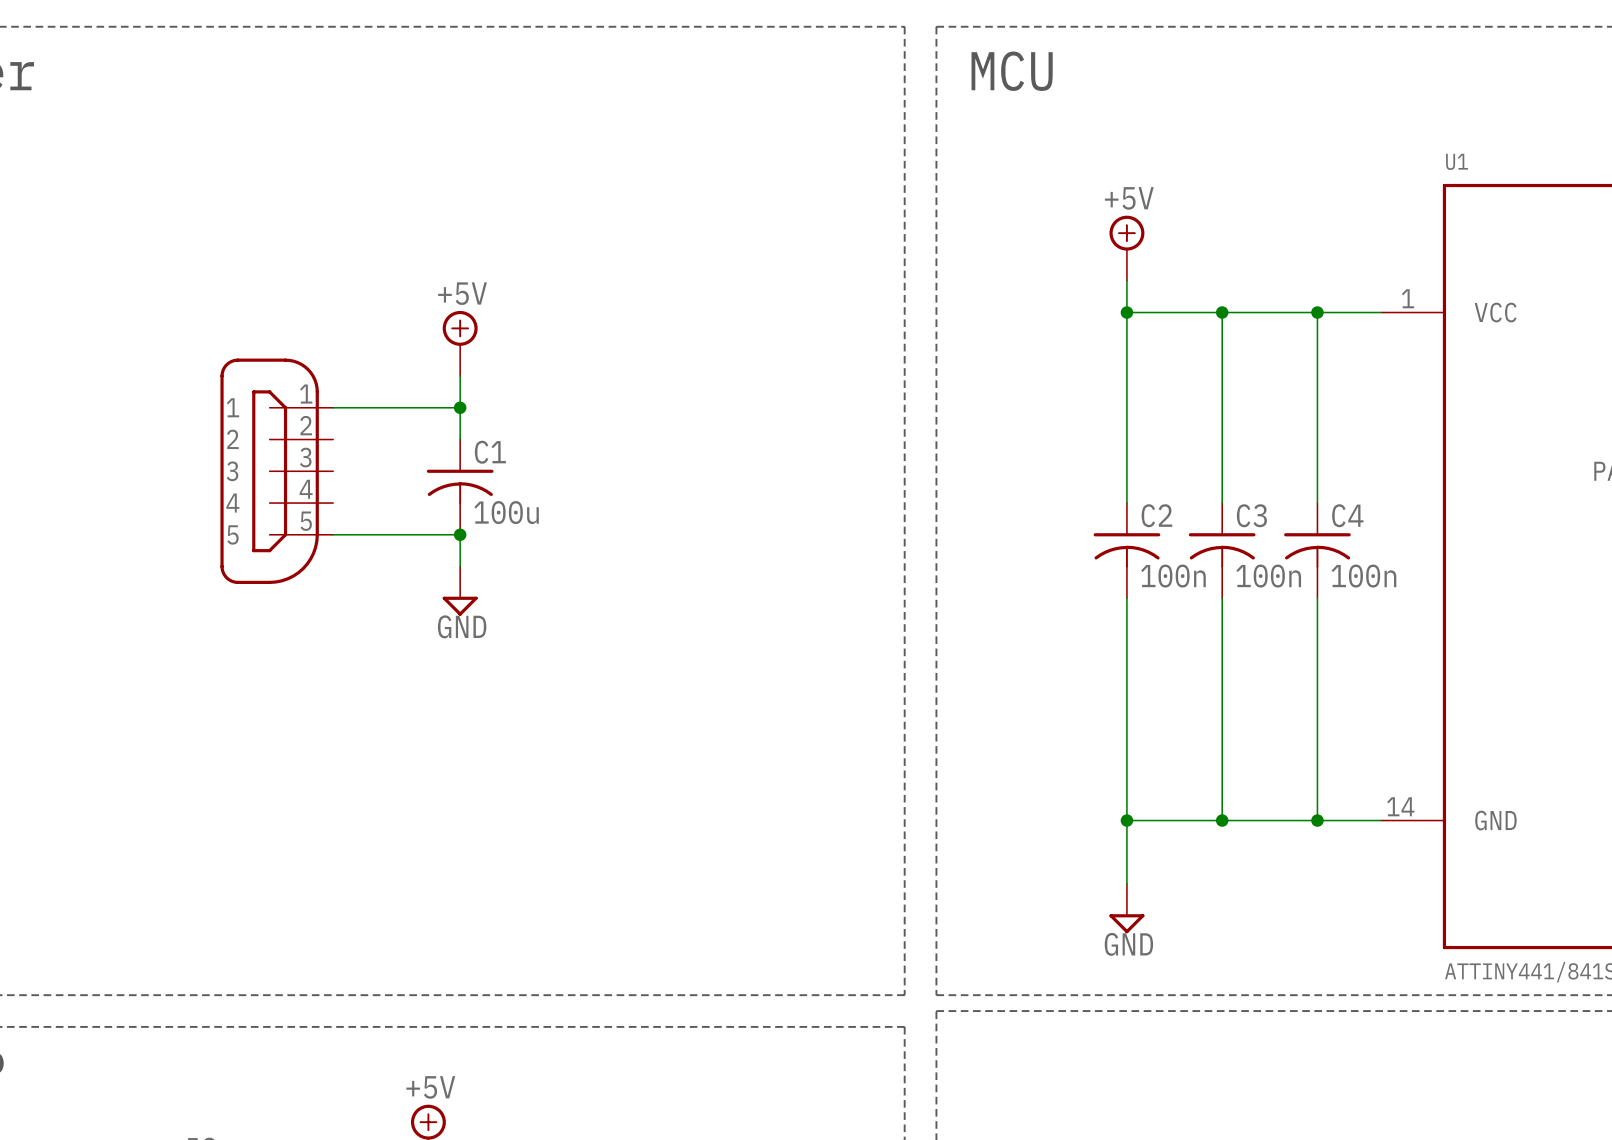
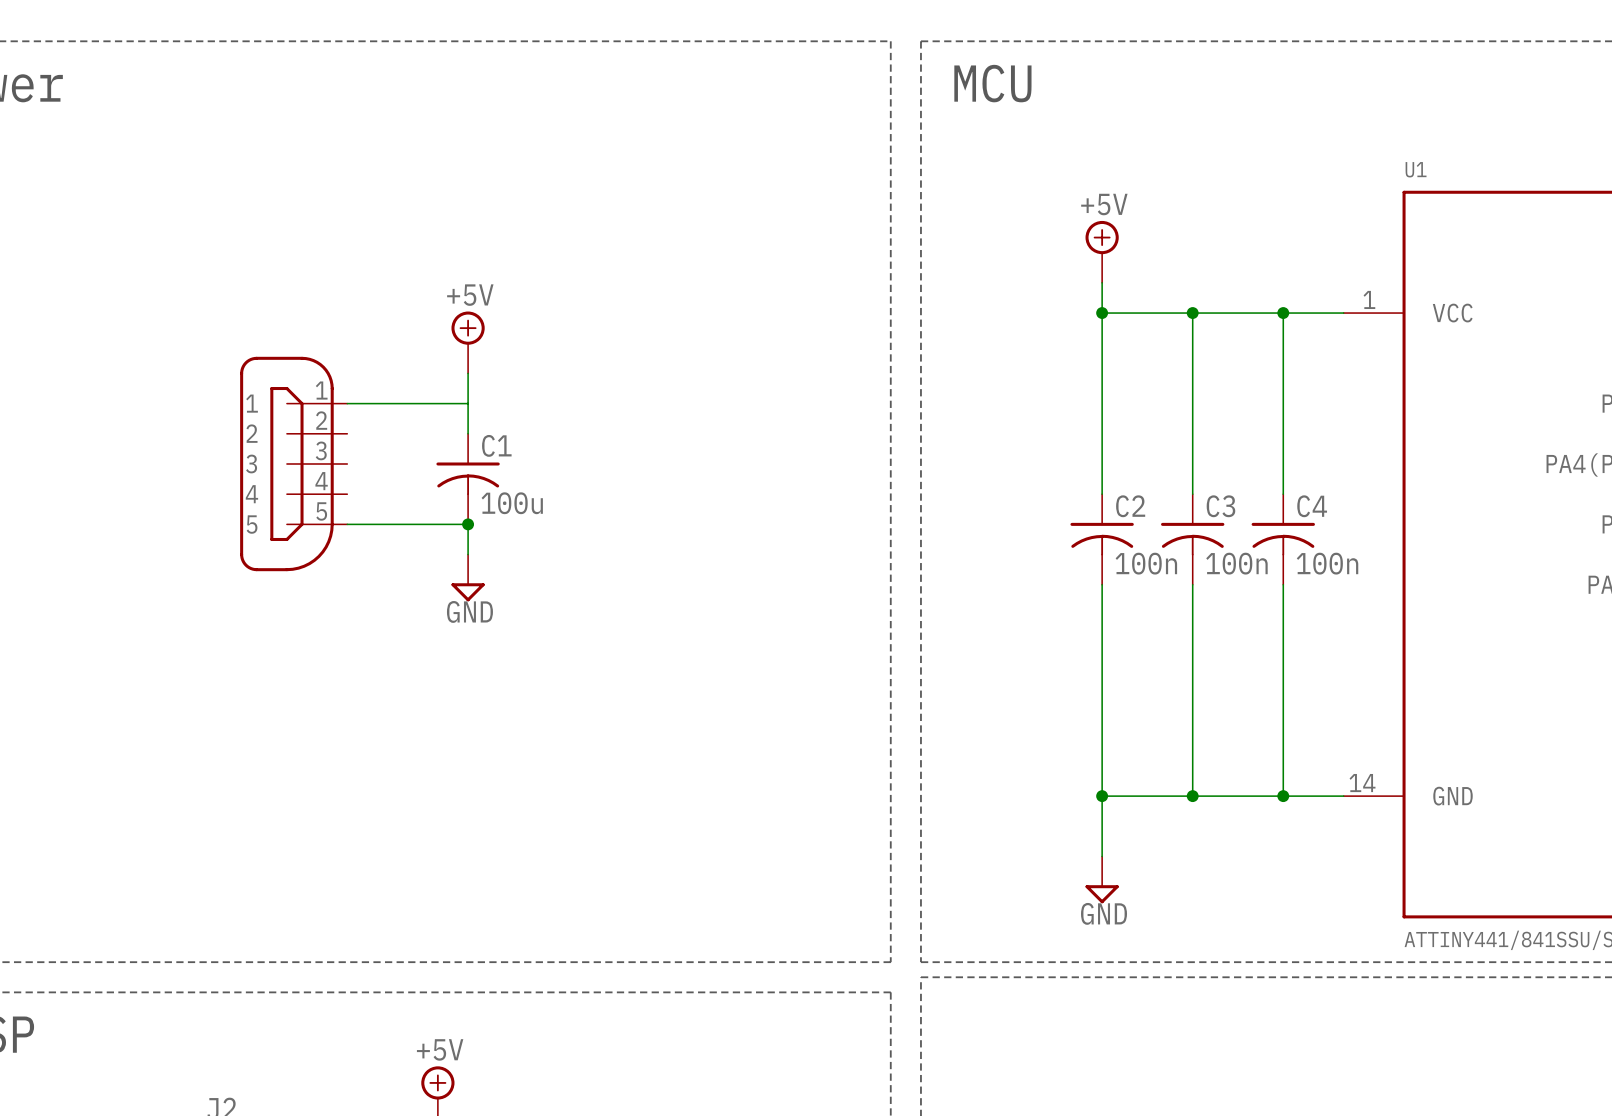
junction: (460, 407) -> none

